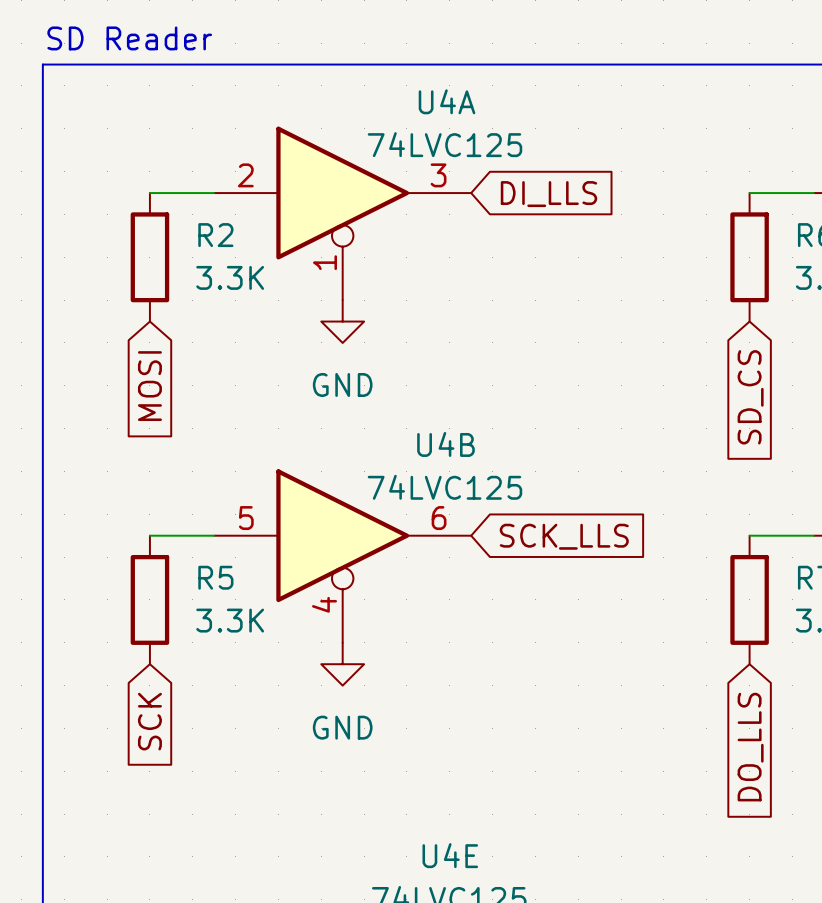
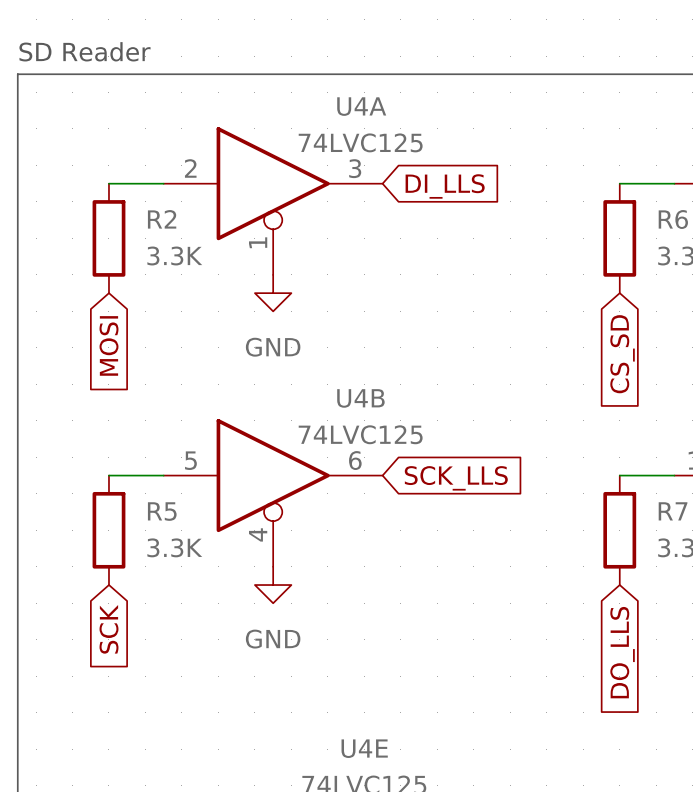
global label: SD_CS (750, 397) -> CS_SD (622, 354)

